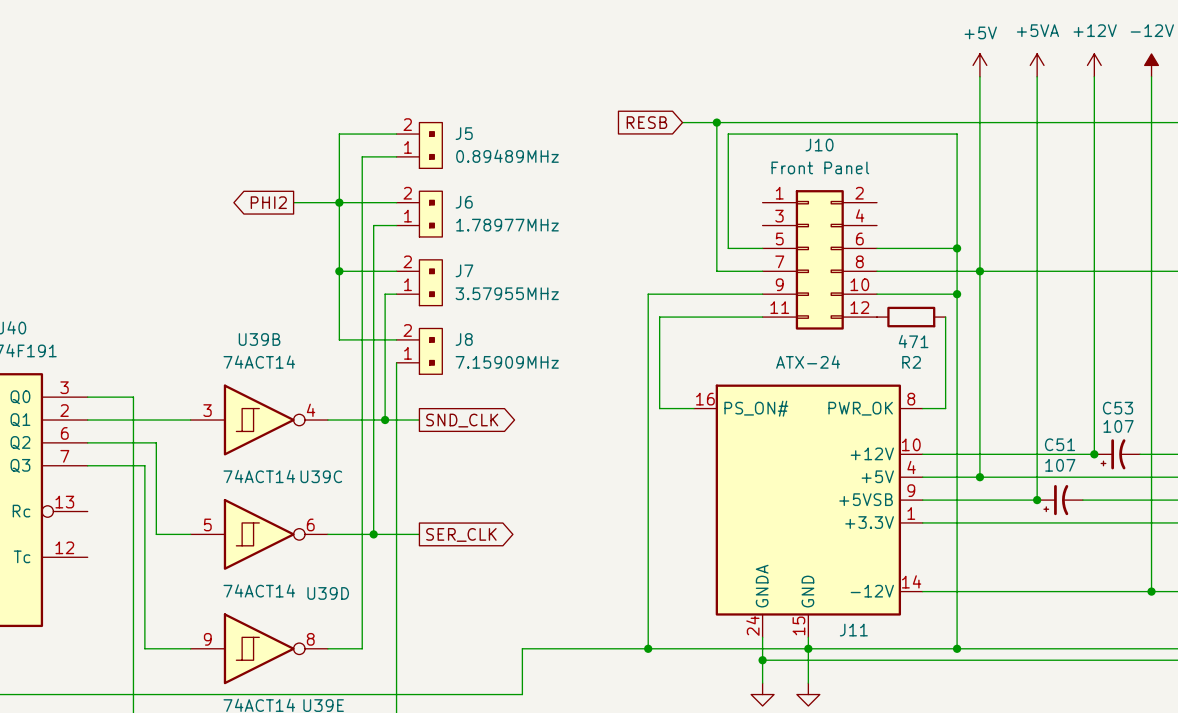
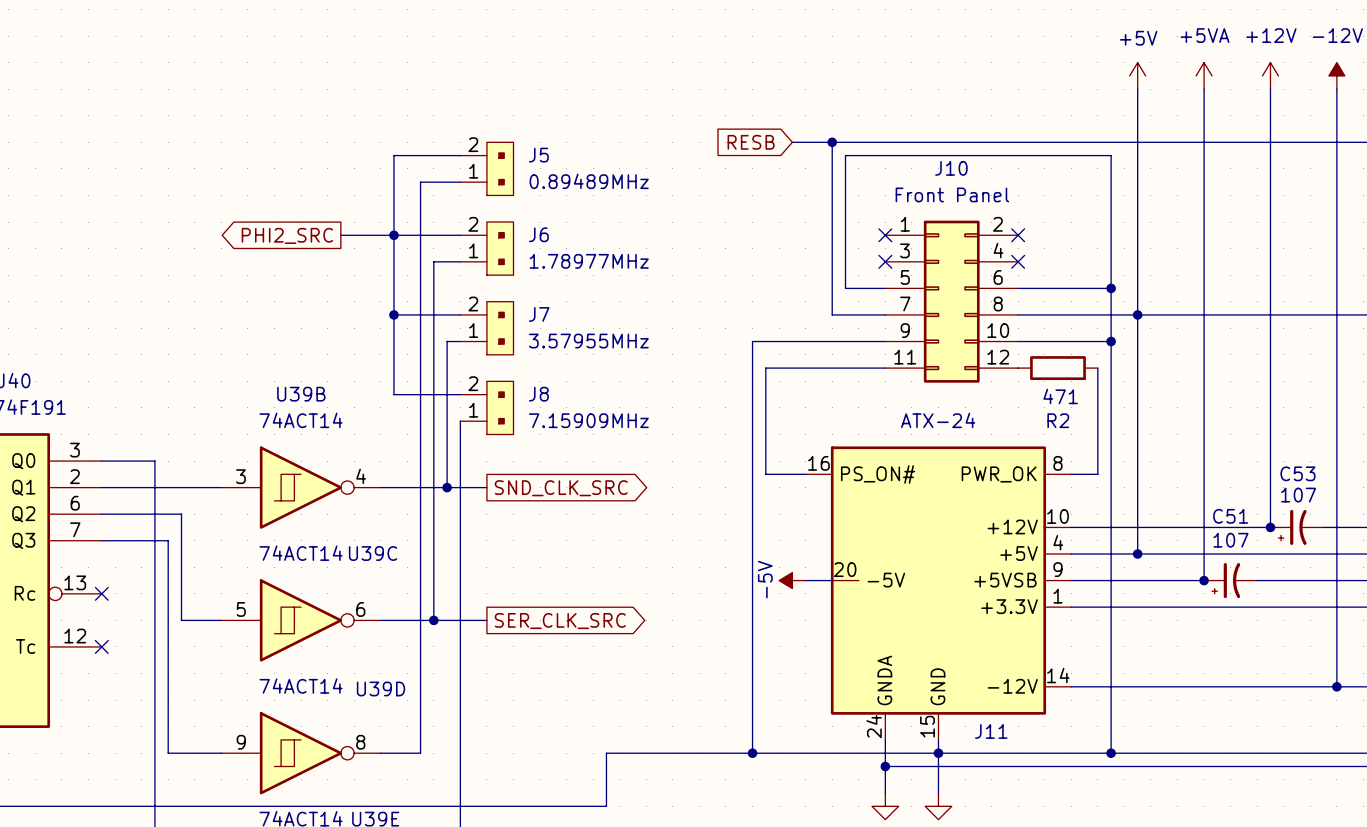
global label: PHI2 (268, 202) -> PHI2_SRC (287, 235)
no-connect mark: none -> (885, 235)
no-connect mark: none -> (1018, 235)
no-connect mark: none -> (885, 261)
no-connect mark: none -> (1018, 261)
J11 symbol: [693, 384, 923, 638] -> [805, 446, 1072, 740]
global label: SND_CLK (462, 420) -> SND_CLK_SRC (561, 488)
power symbol: none -> -5V (792, 580)
wire: none -> (805, 580) (832, 580)
no-connect mark: none -> (101, 593)
global label: SER_CLK (461, 534) -> SER_CLK_SRC (560, 621)
no-connect mark: none -> (101, 646)

